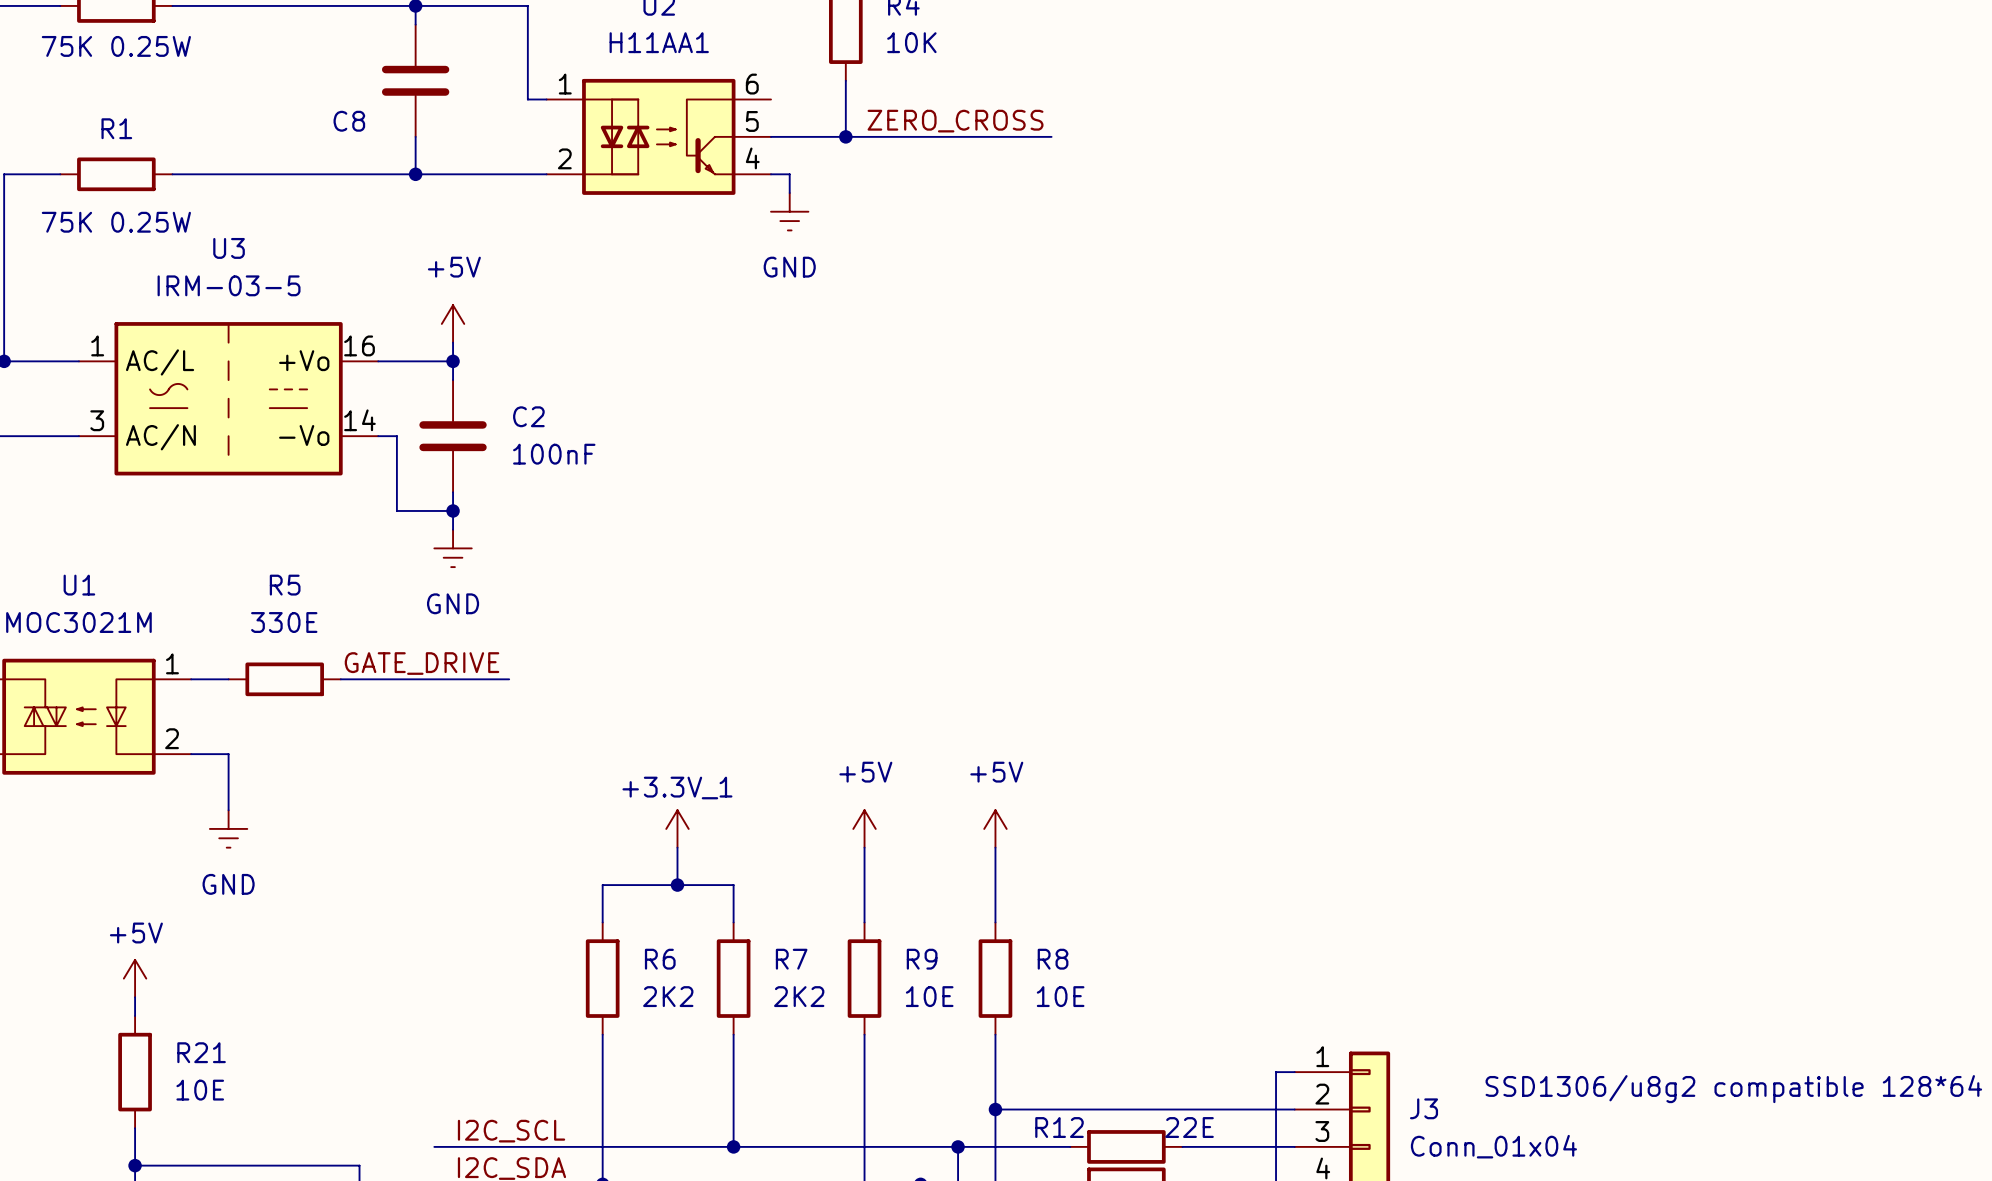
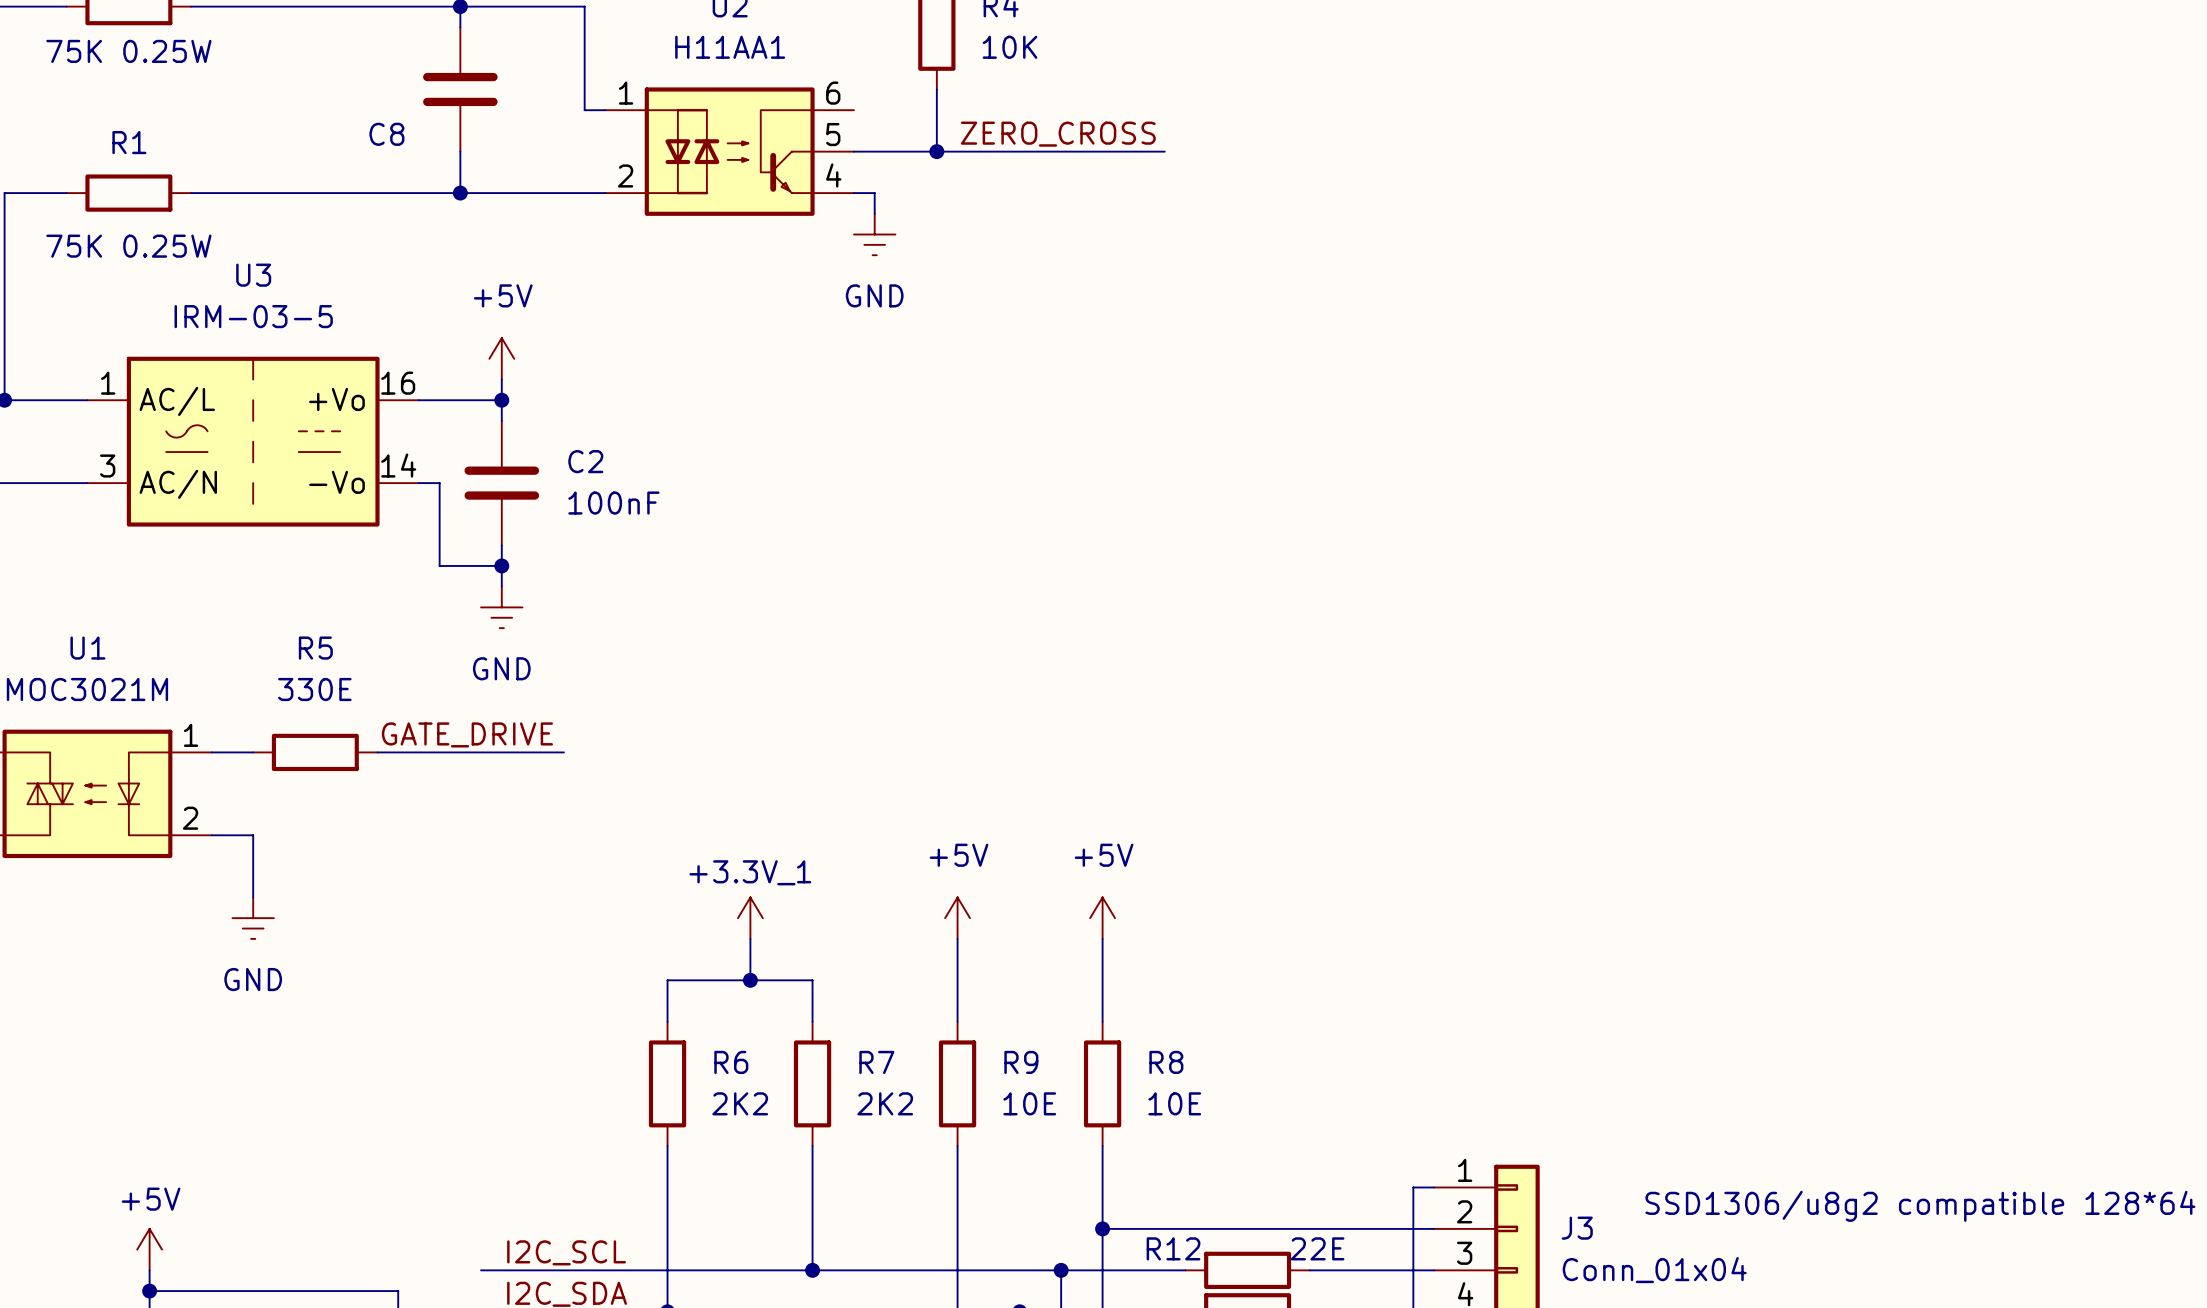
power symbol position: +5V (135, 978) -> +5V (149, 1249)
wire: (135, 997) (135, 1016) -> none
R21: 10E (135, 1072) -> none

